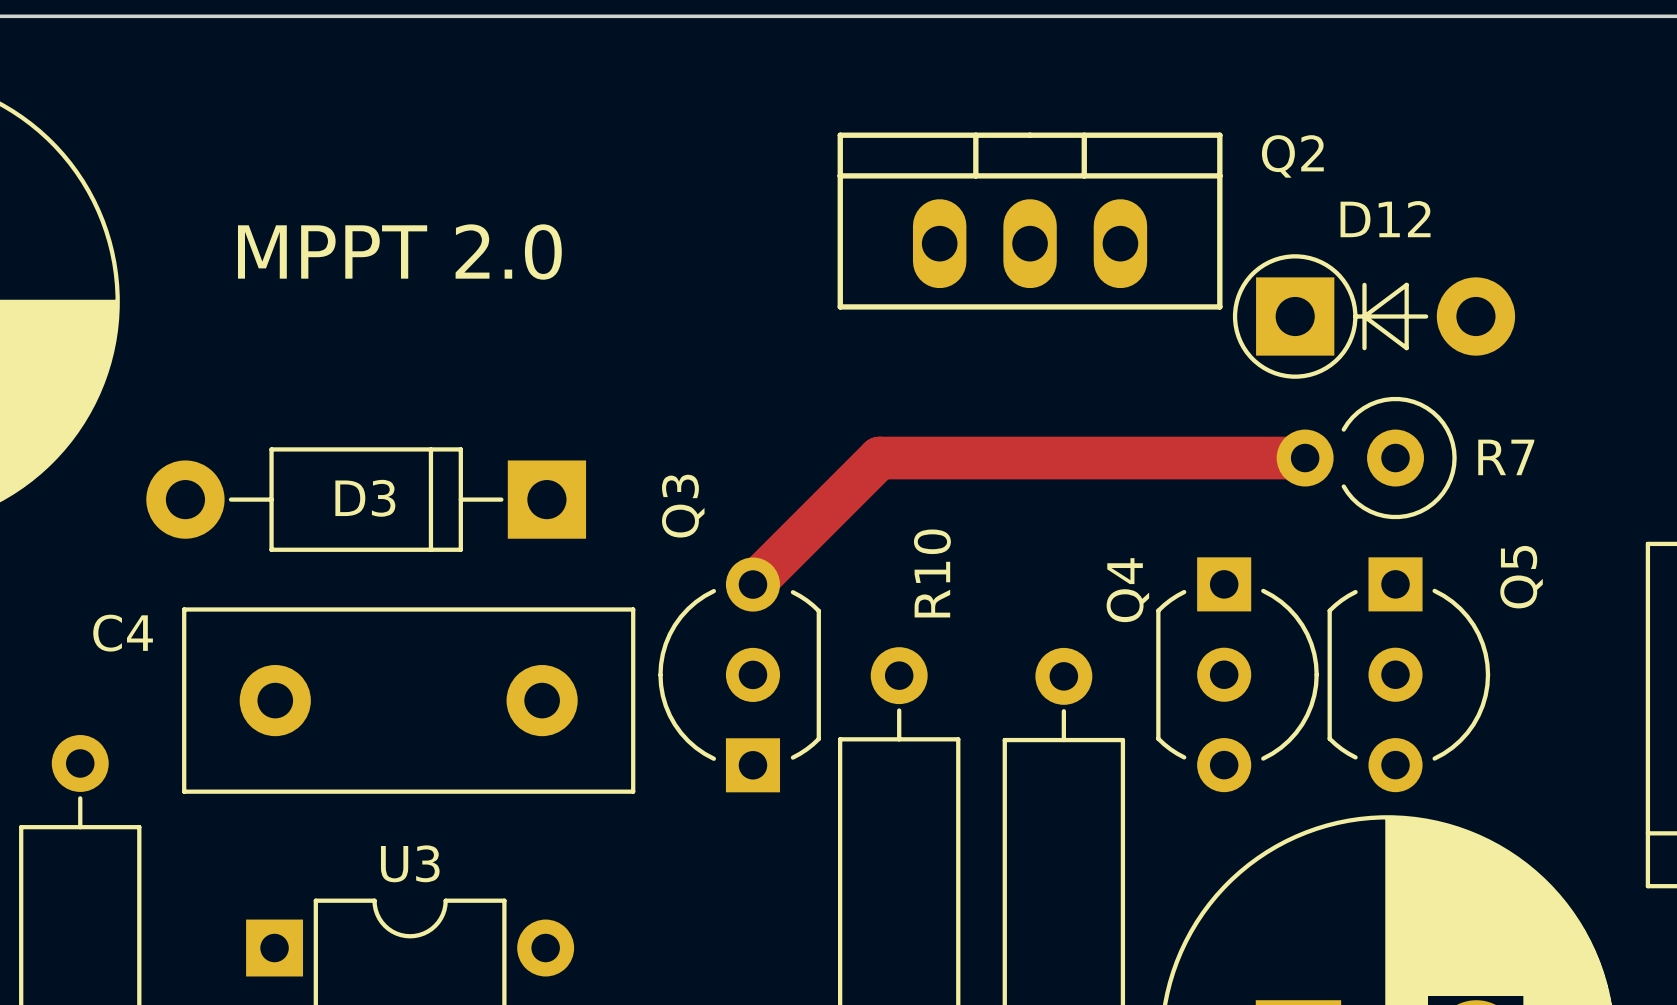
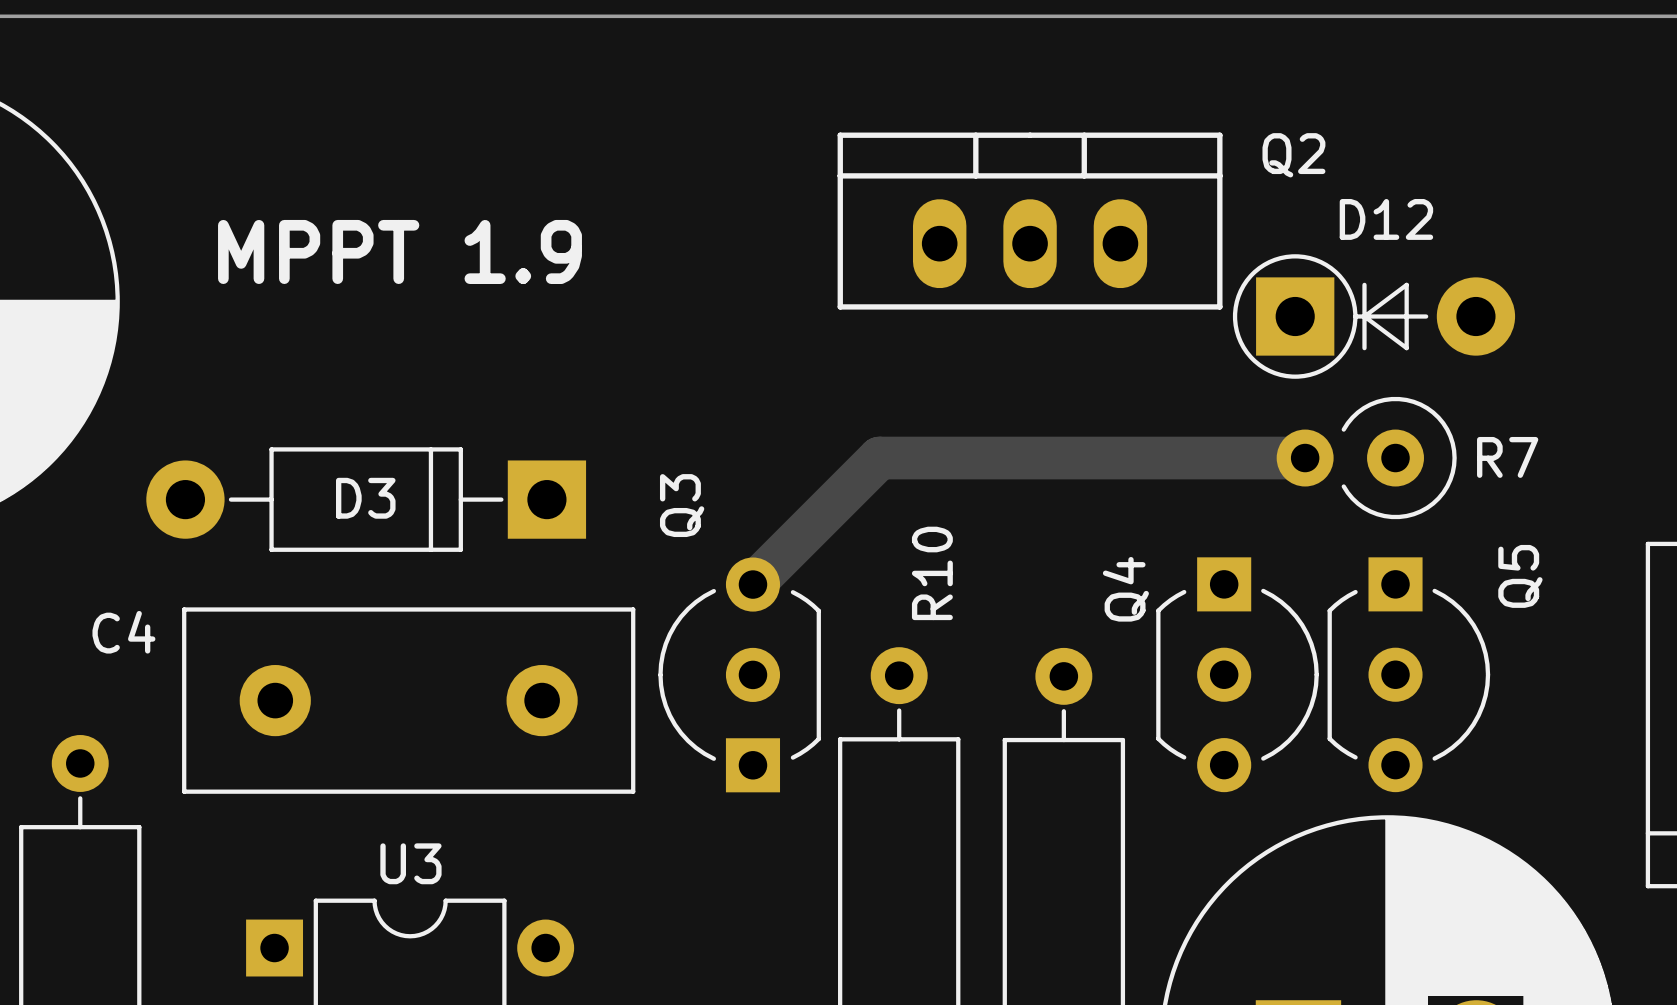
text: MPPT 2.0 (399, 252) -> MPPT 1.9 (399, 251)

